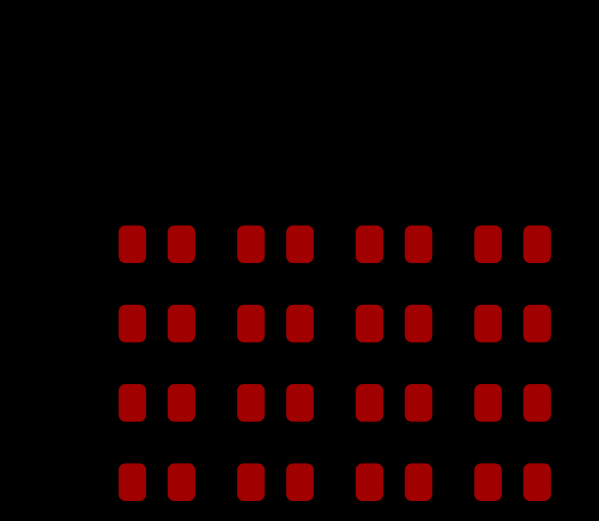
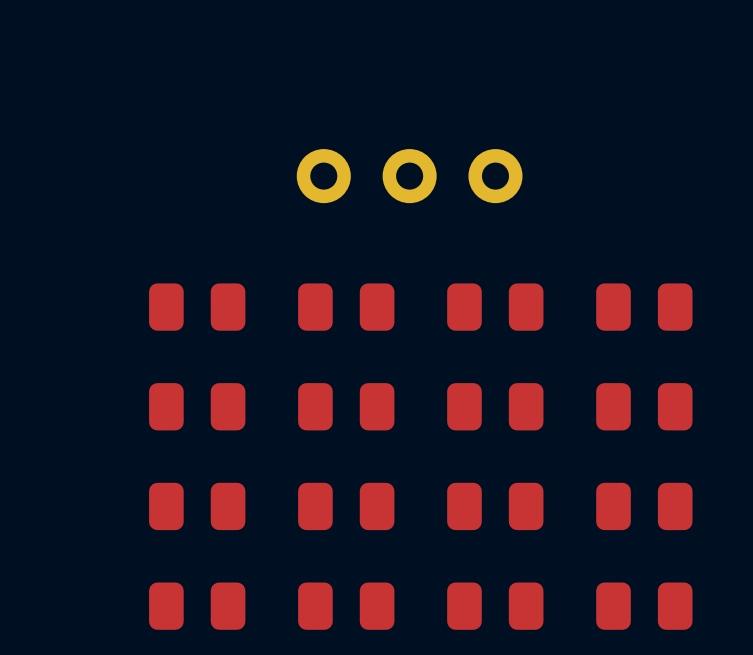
part: none -> (409, 176)

